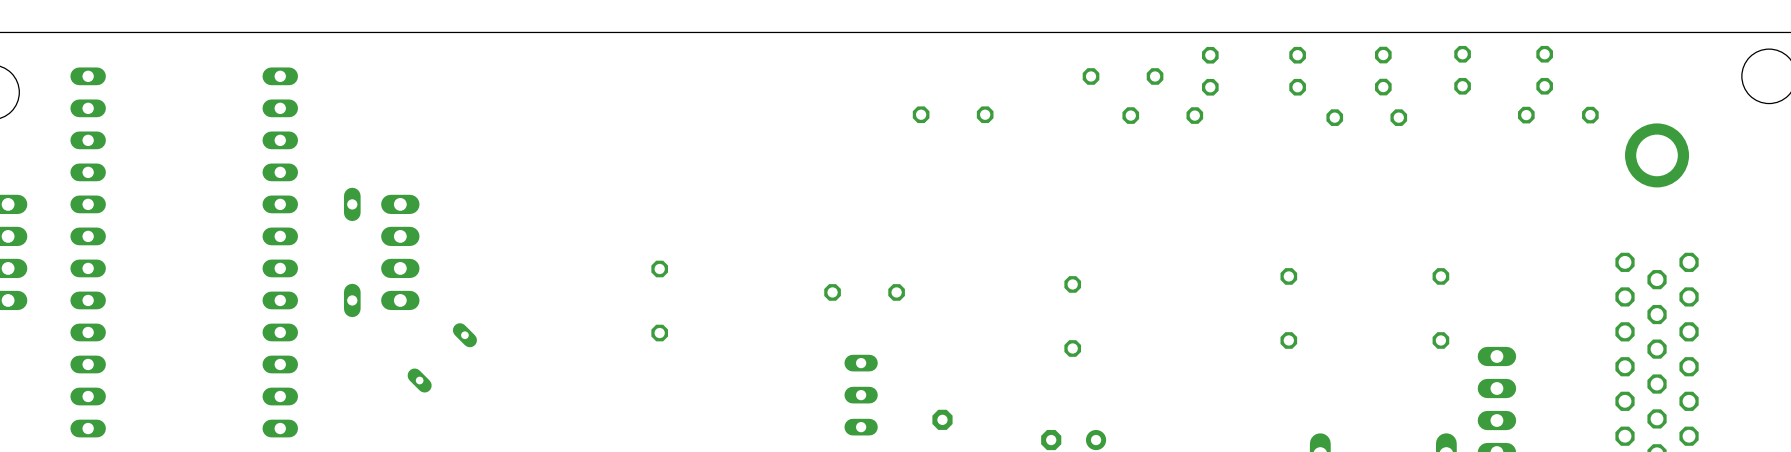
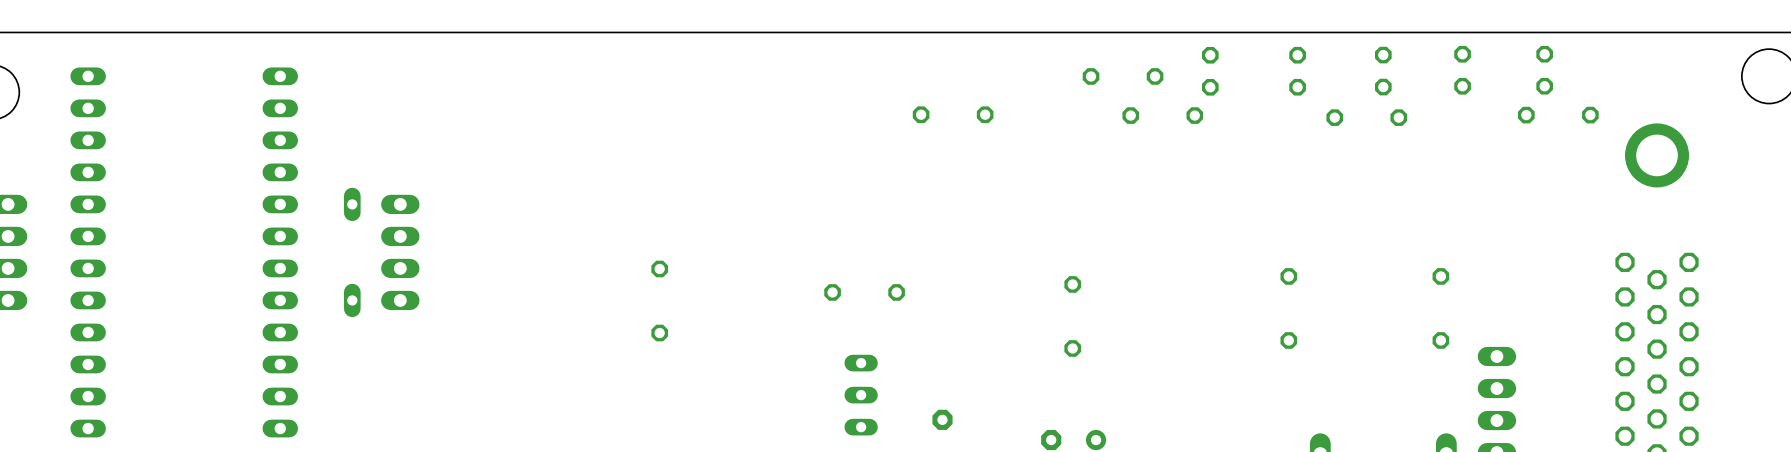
part: (442, 357) -> none

